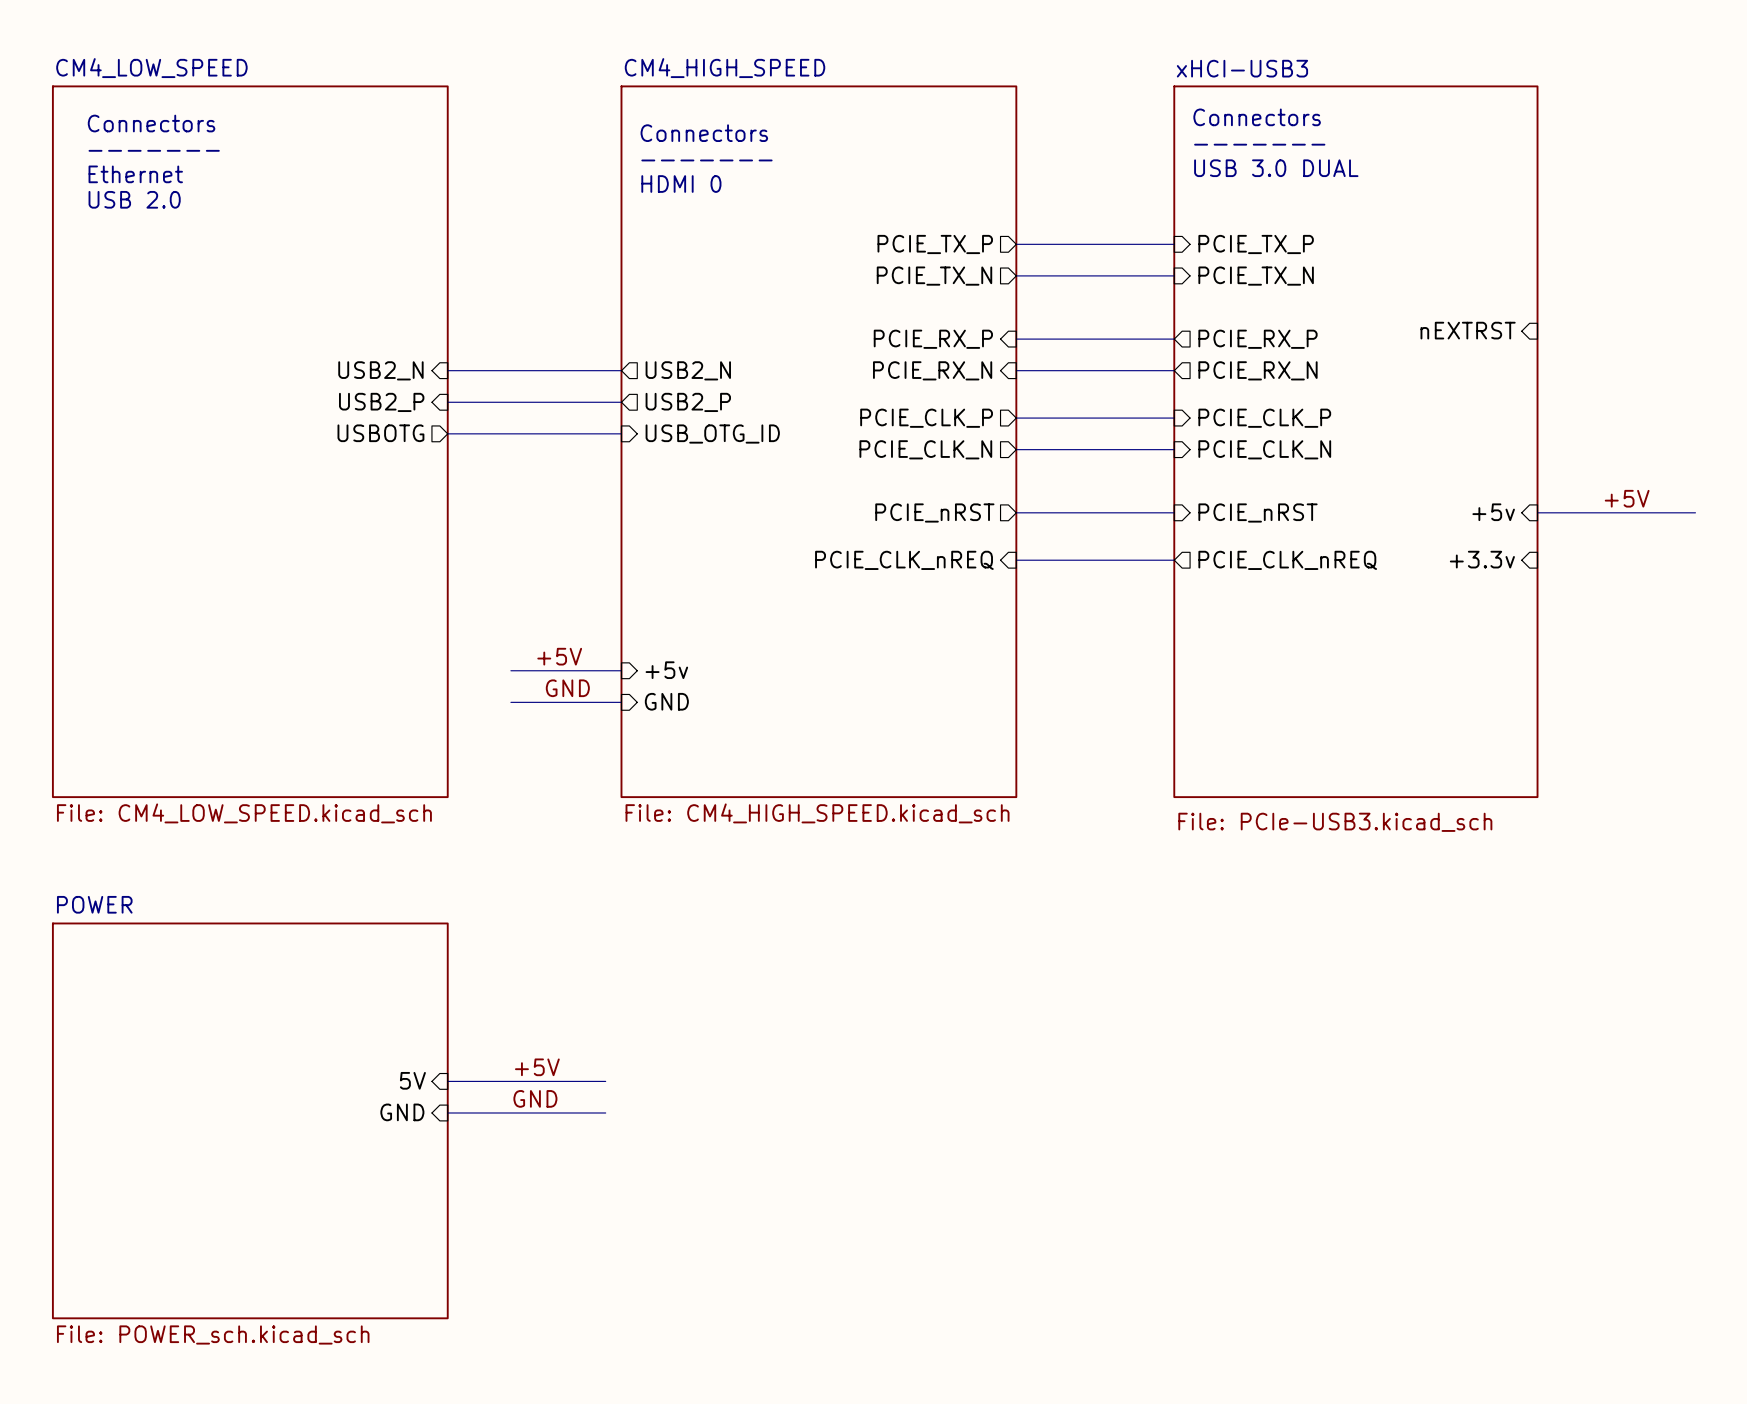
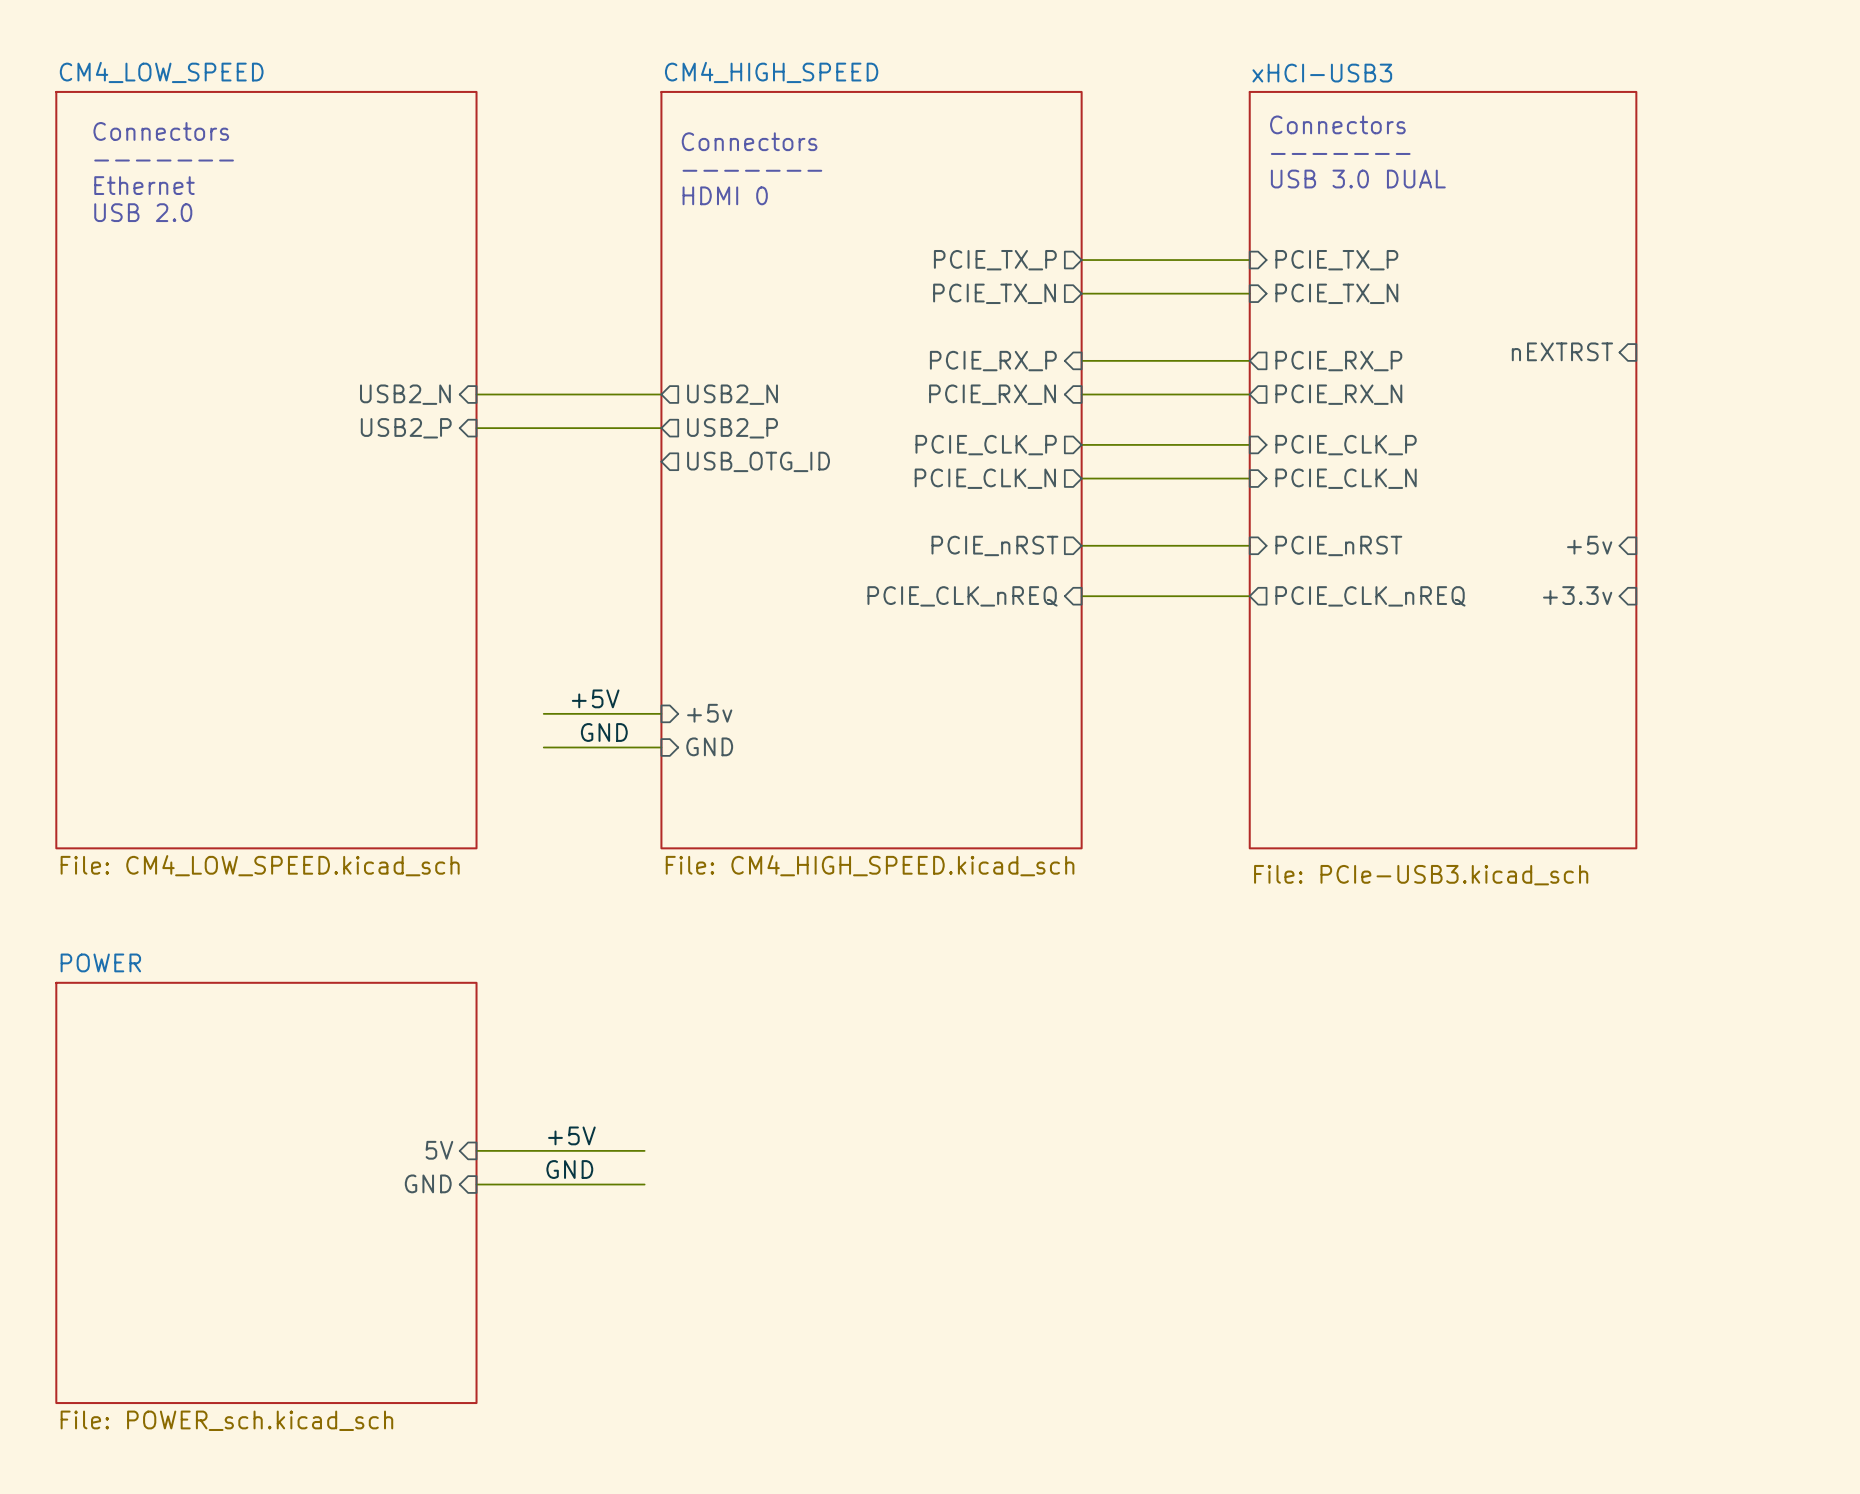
sheet pin: USBOTG (380, 433) -> none
wire: (447, 433) (621, 433) -> none
sheet pin shape: input (712, 434) -> output (758, 461)
label: +5V (1627, 498) -> none
wire: (1537, 512) (1695, 512) -> none

